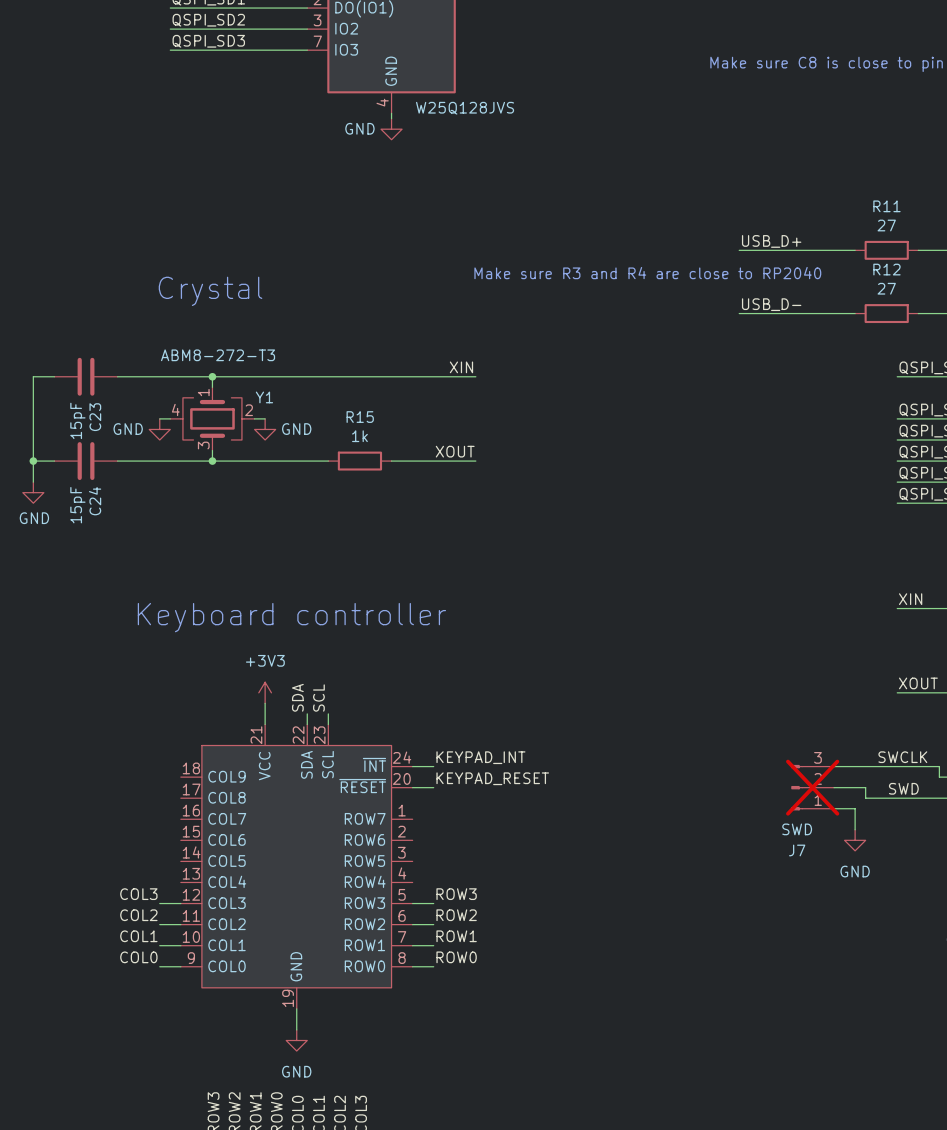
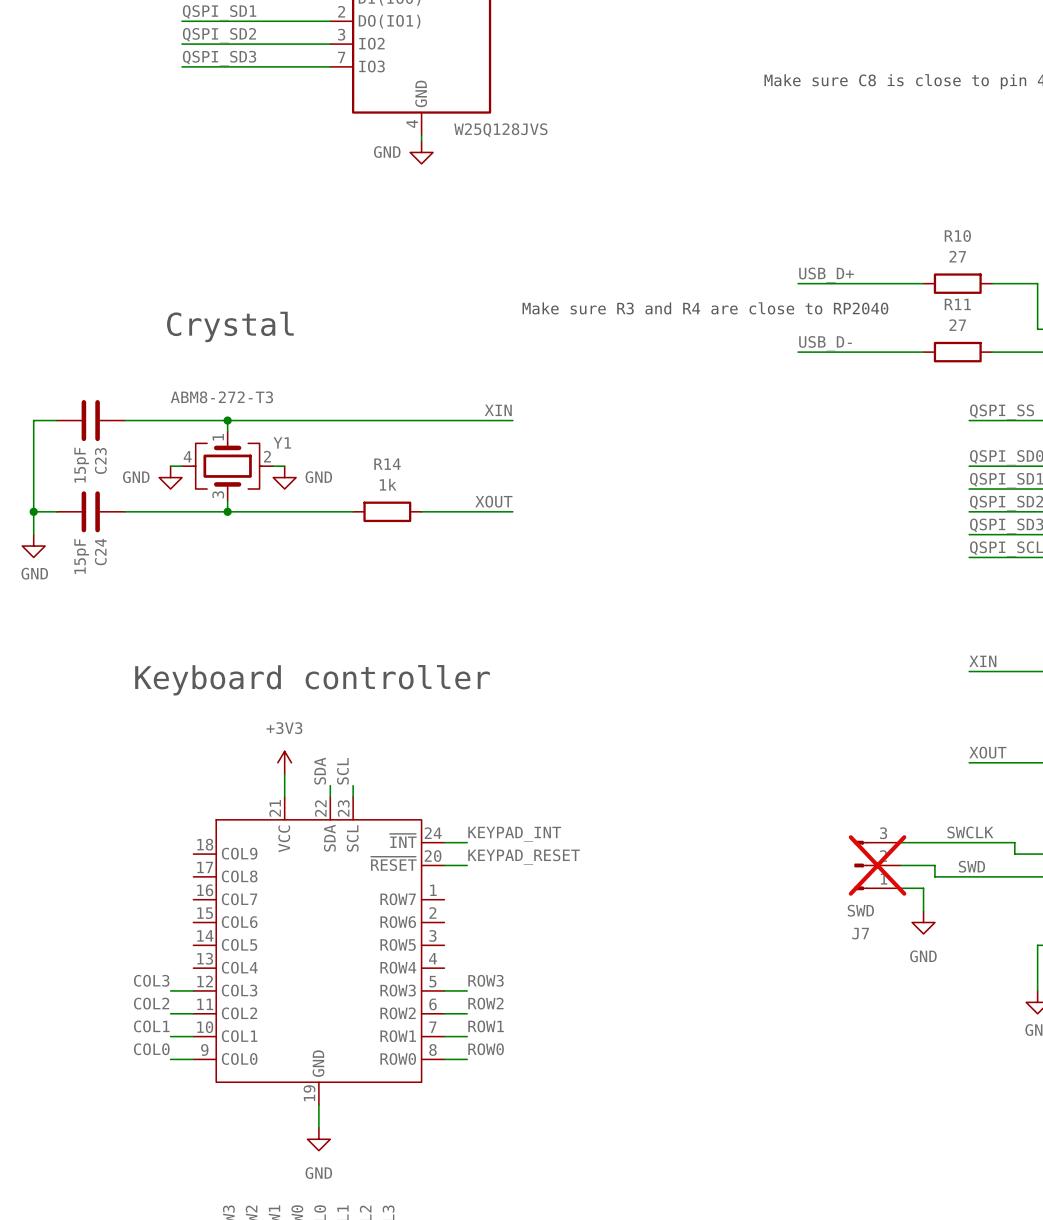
R11 name: R11 (886, 206) -> R10 (957, 236)
R12 name: R12 (886, 269) -> R11 (957, 304)
R15 name: R15 (360, 417) -> R14 (387, 464)

